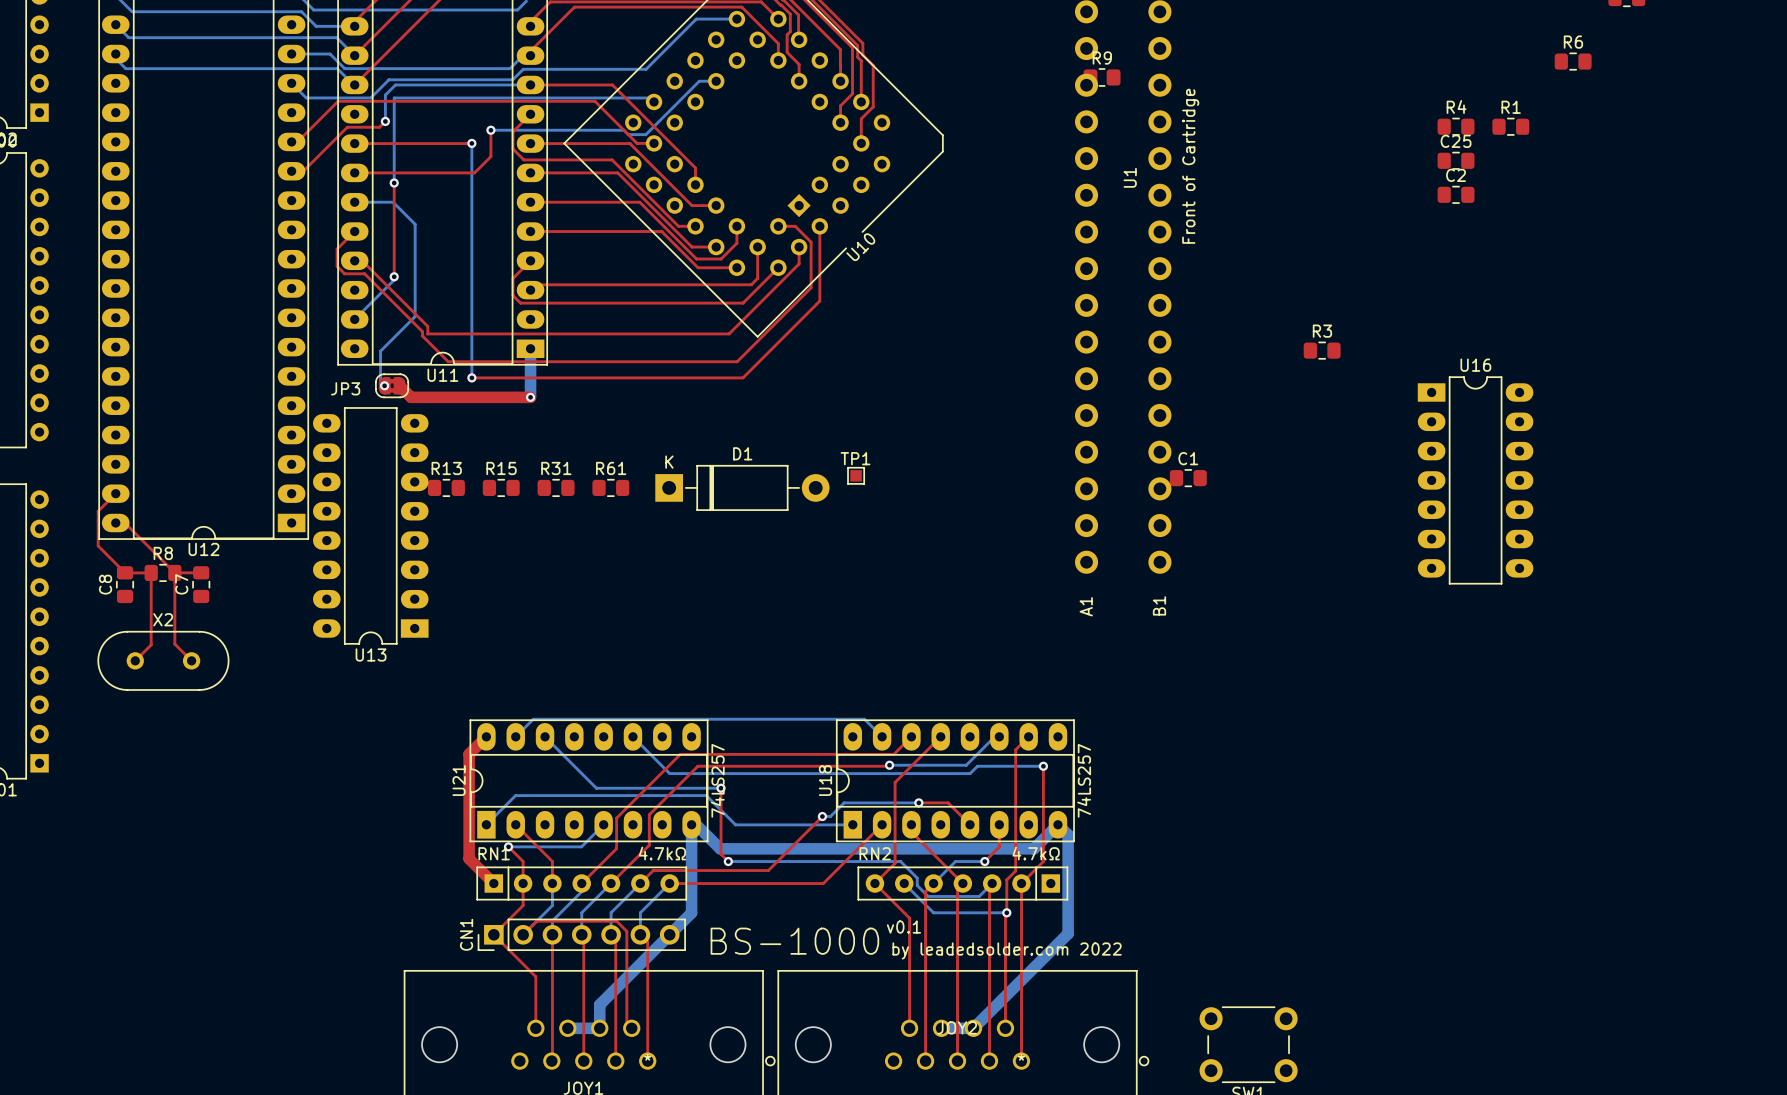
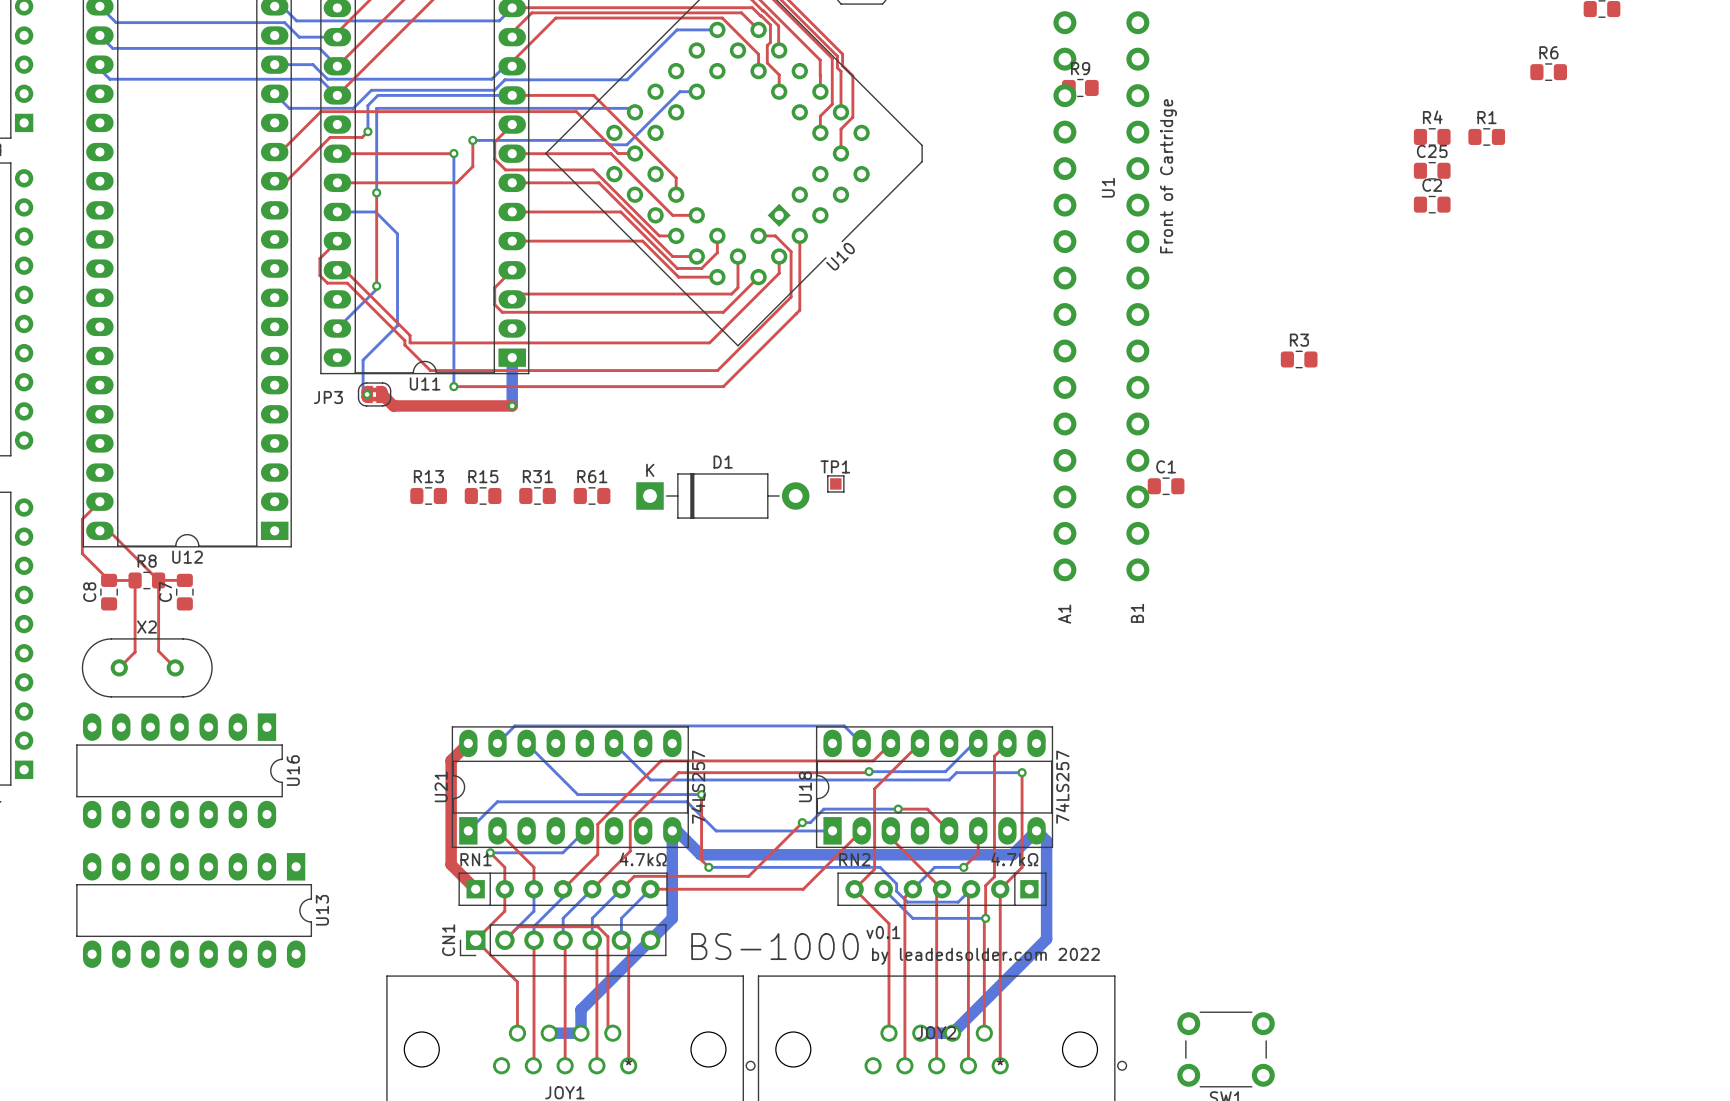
U16 rotation: 0° (1475, 480) -> 90° clockwise (179, 770)
U16 position: (1475, 480) -> (179, 770)
U13 rotation: 0° (370, 525) -> 90° counterclockwise (194, 910)
U13 position: (370, 525) -> (194, 910)

